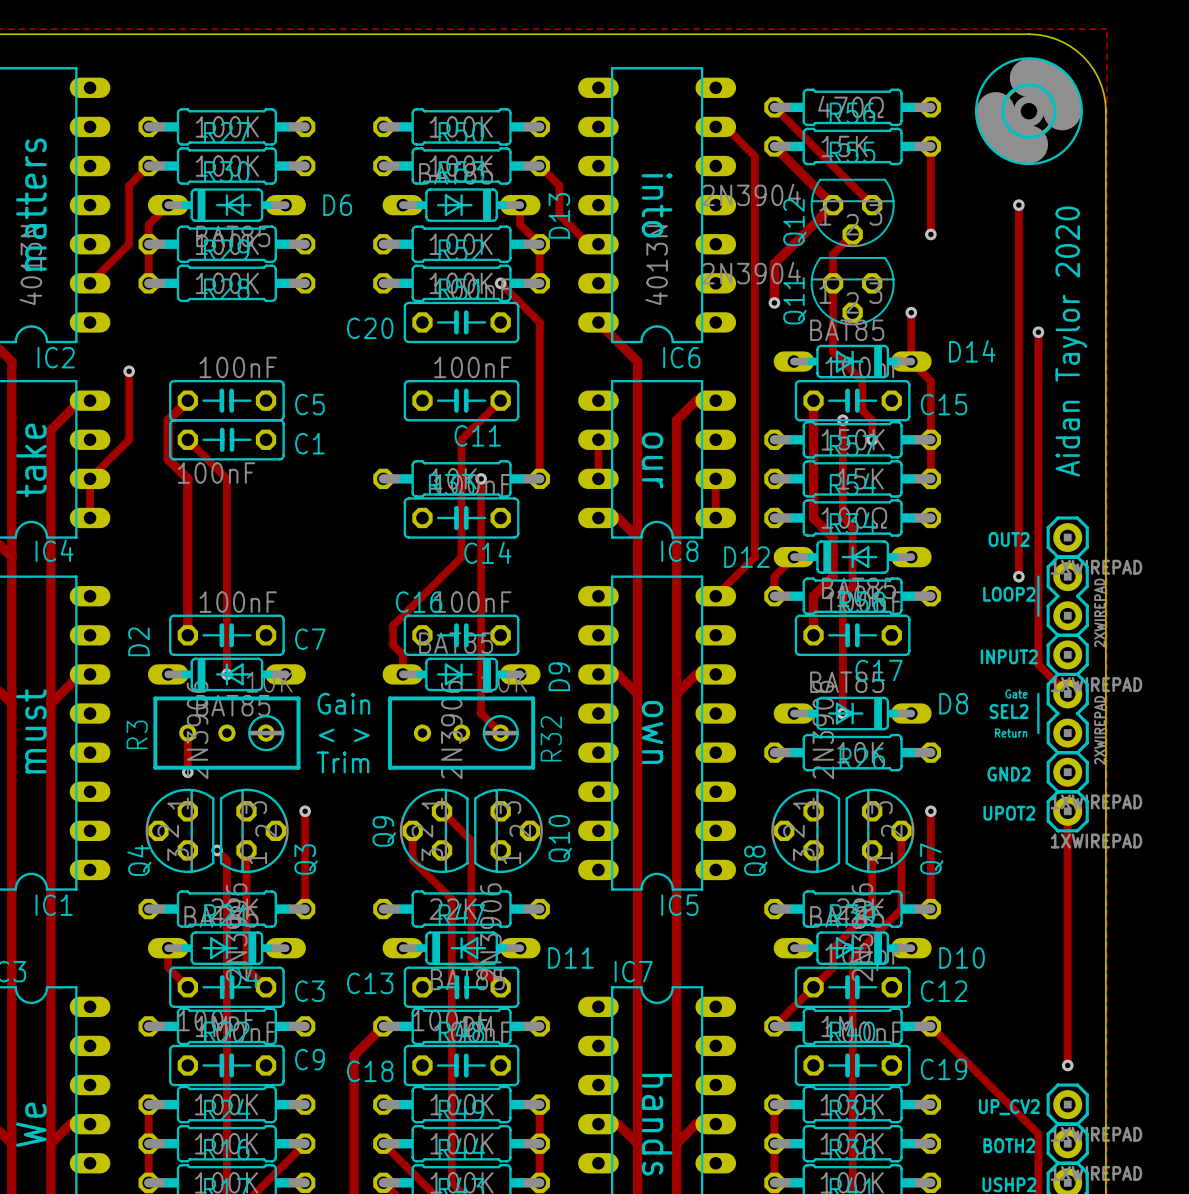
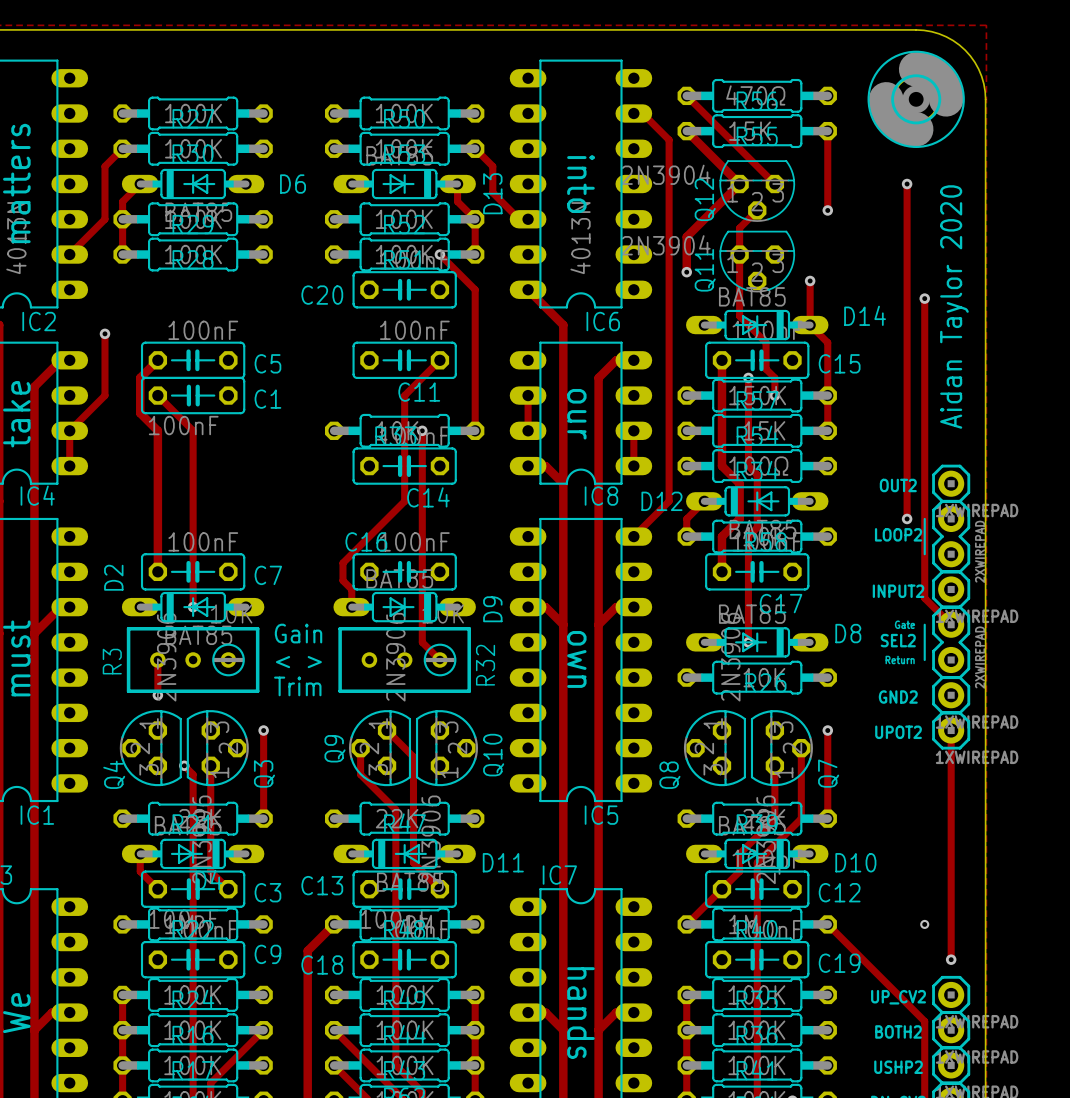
via: none -> (924, 924)

